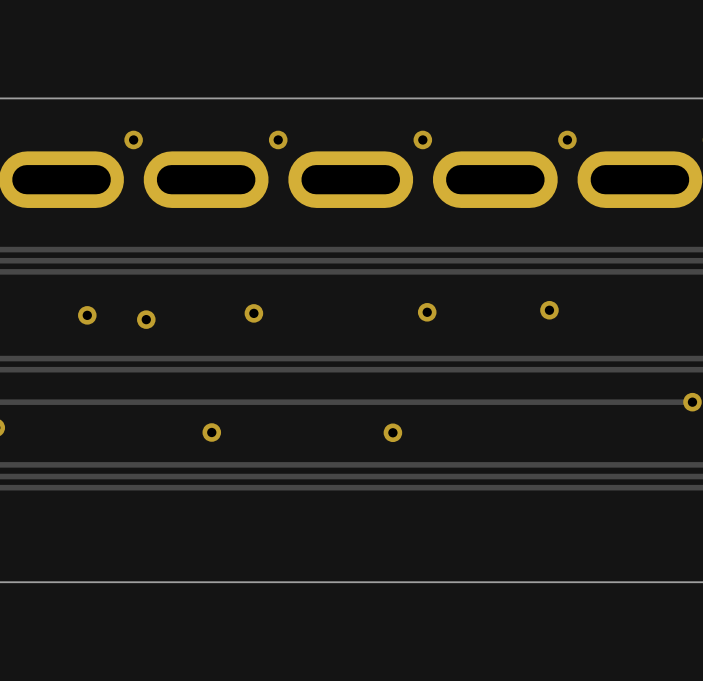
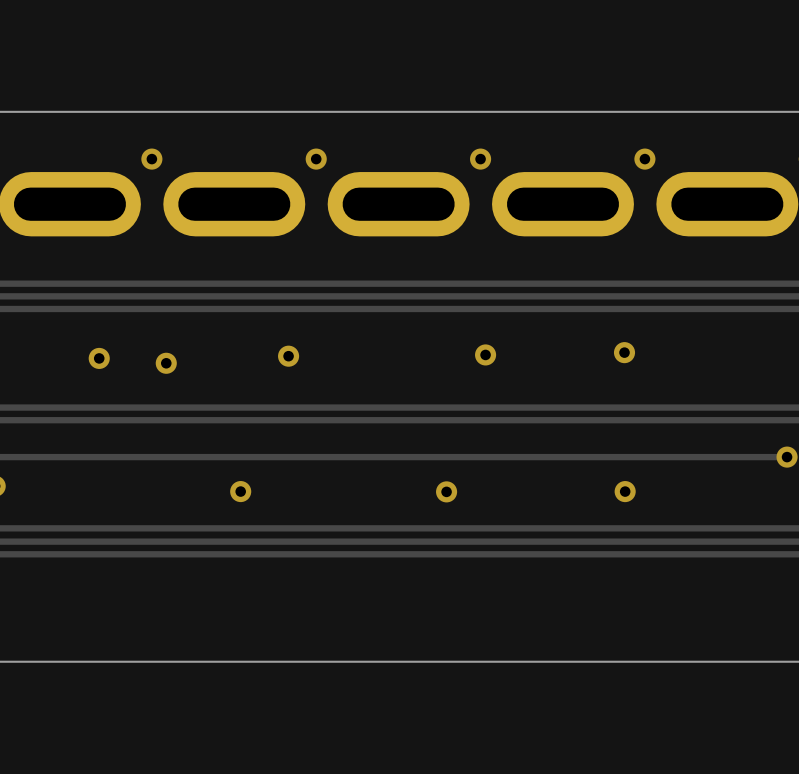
via: none -> (625, 491)

